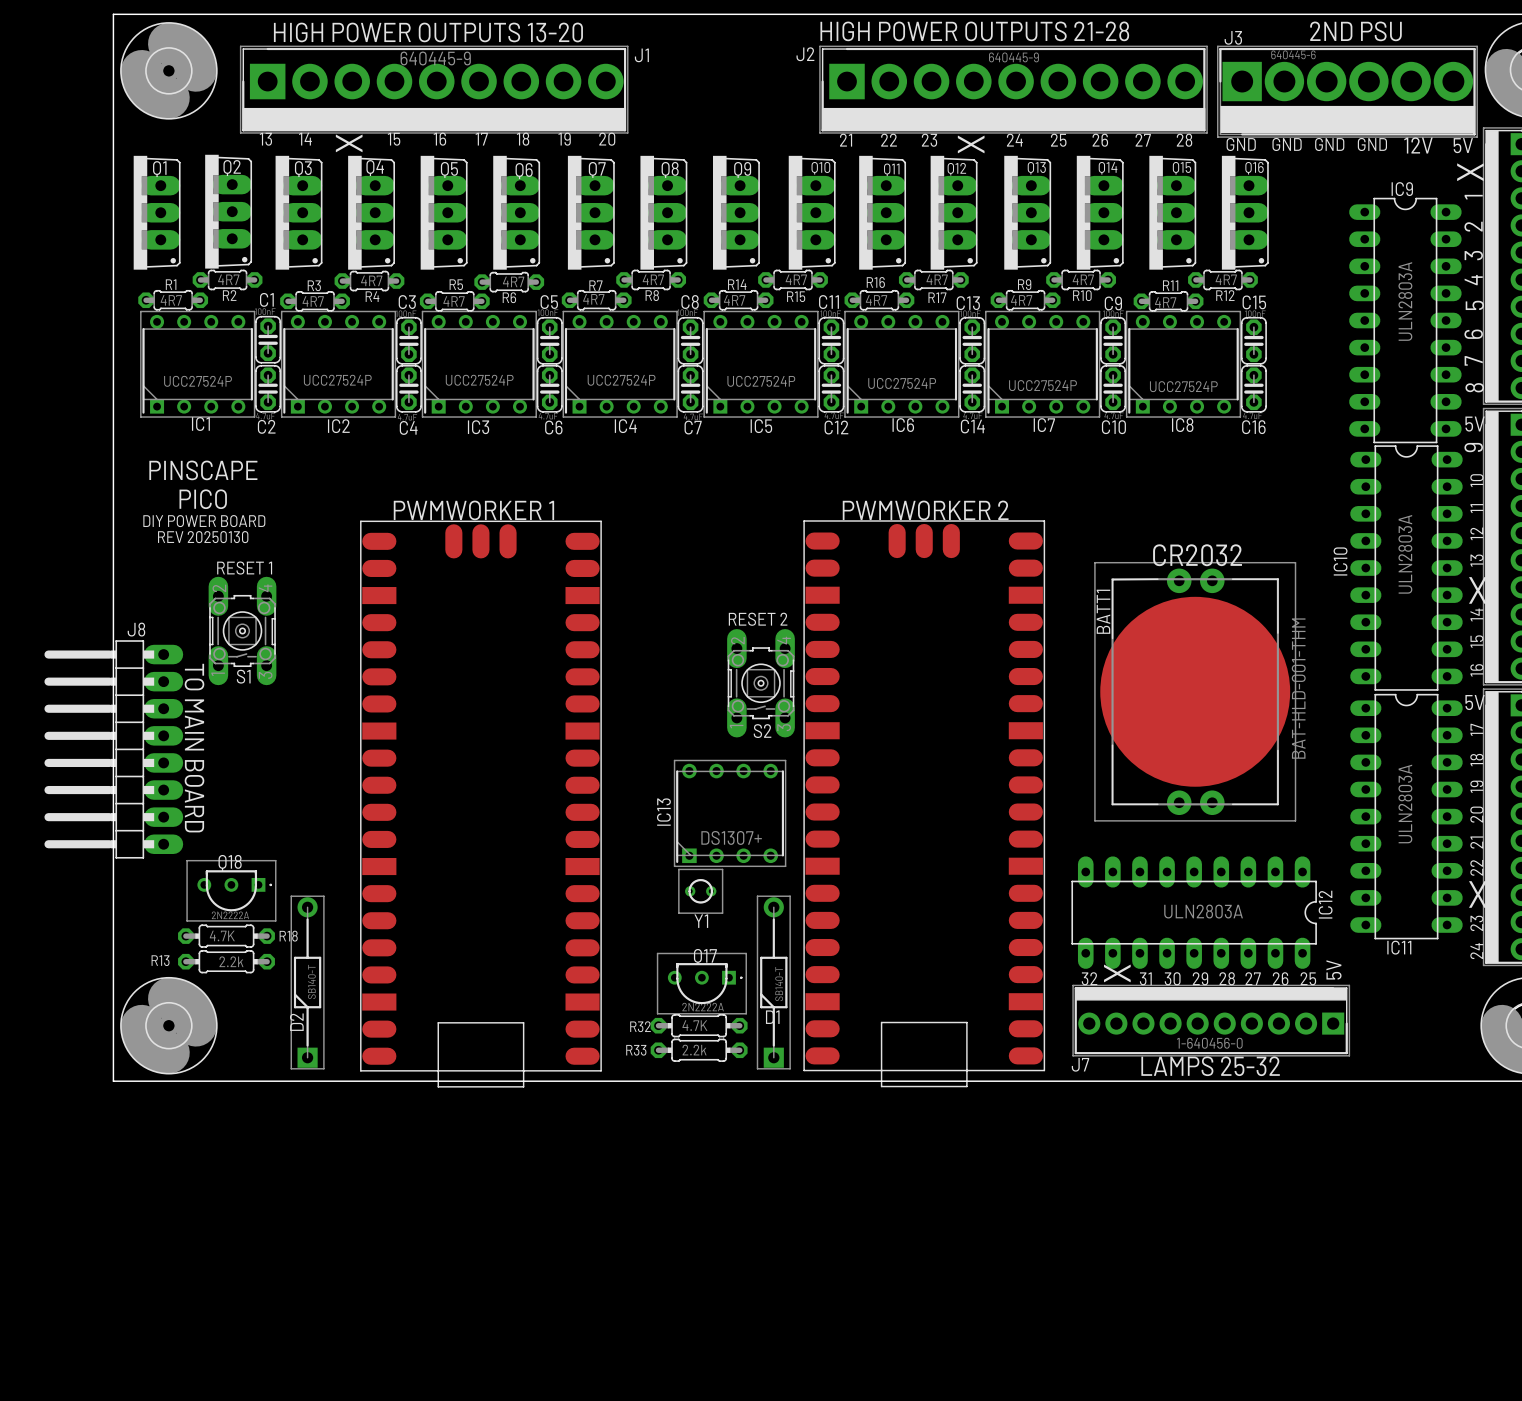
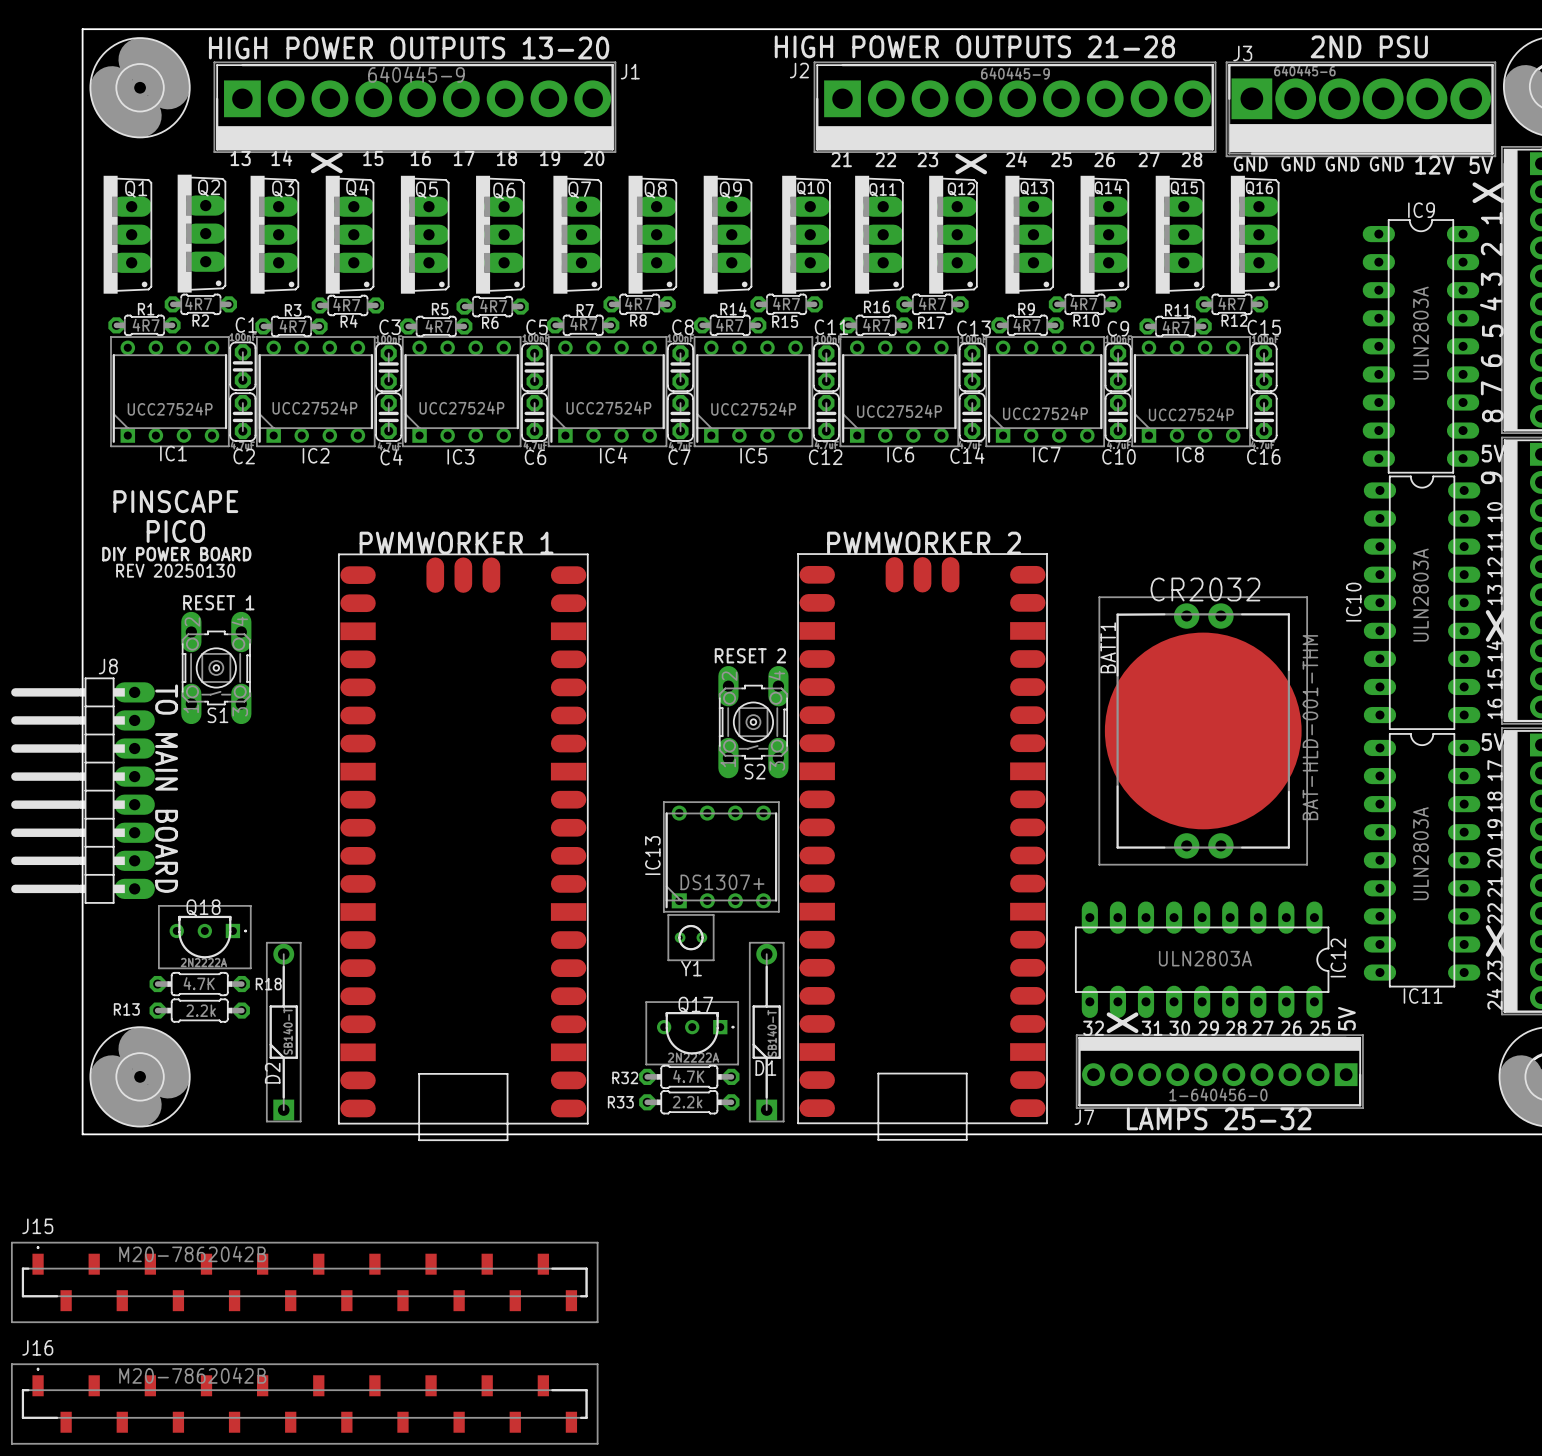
J15: none -> M20-7862042B (304, 1282)
J16: none -> M20-7862042B (304, 1404)

